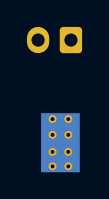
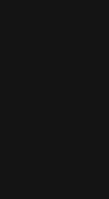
part: (54, 40) -> none
part: (60, 142) -> none

